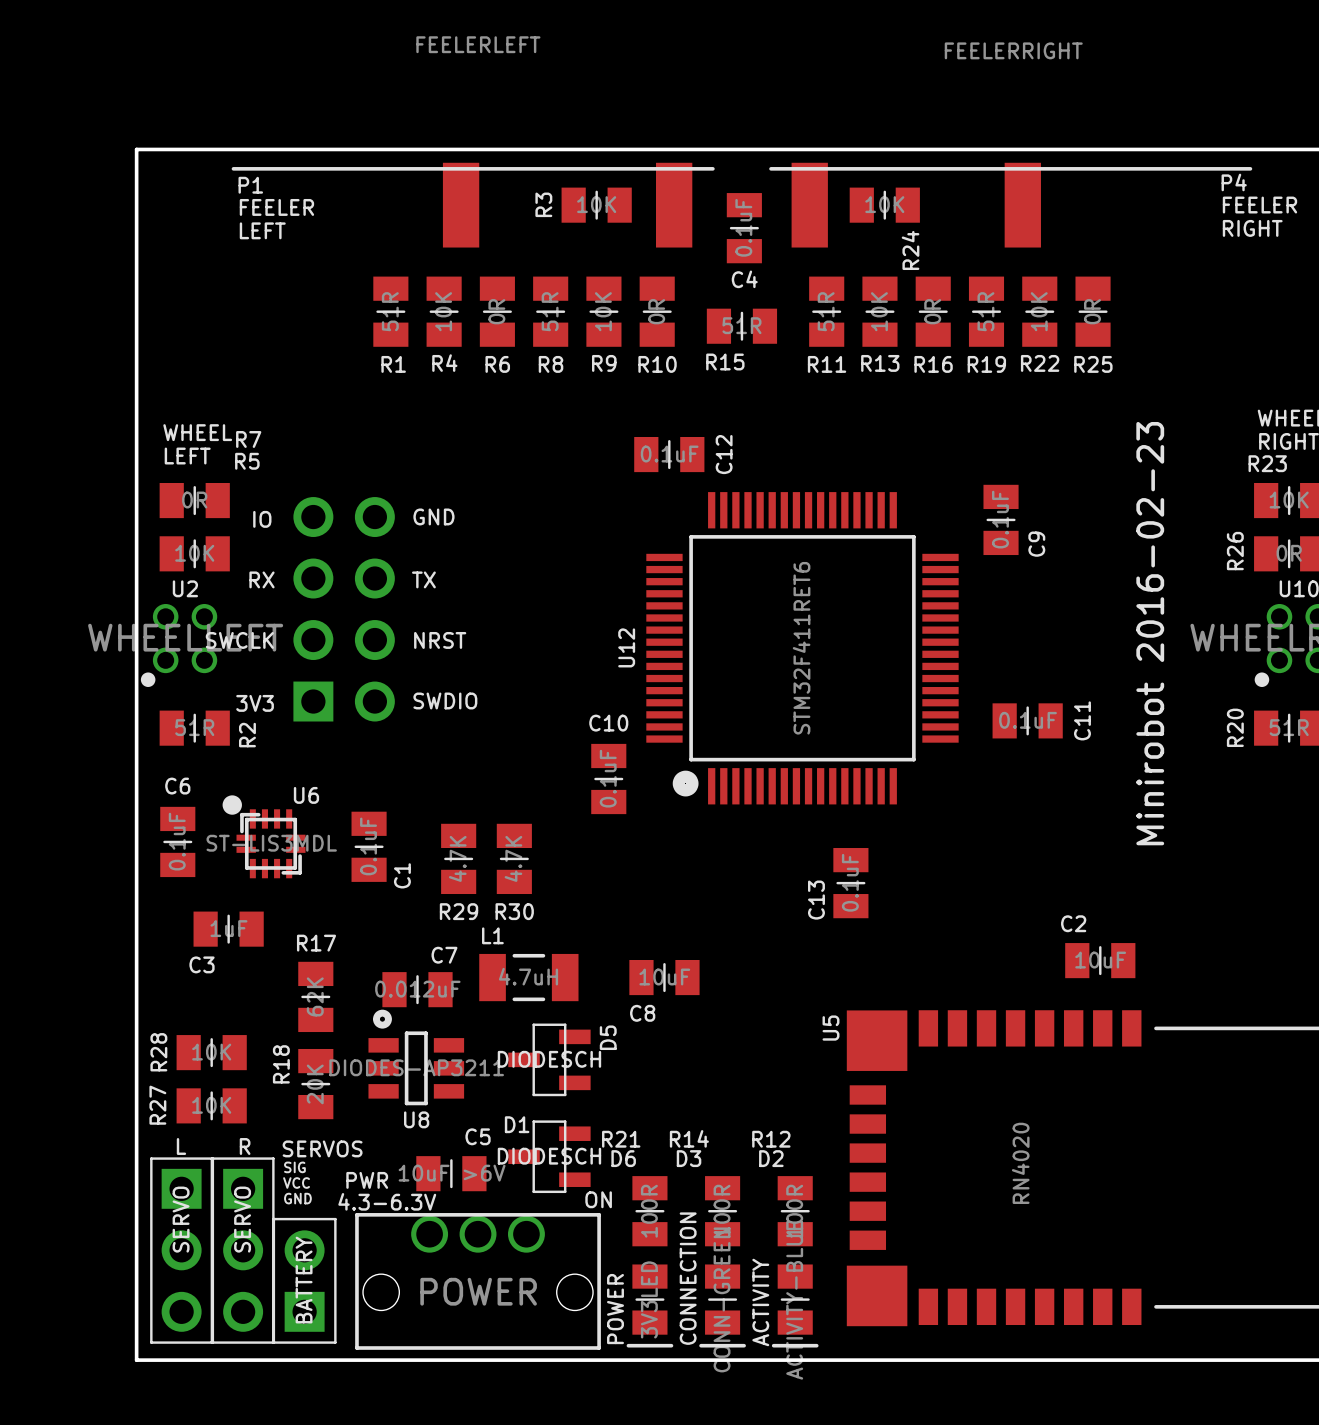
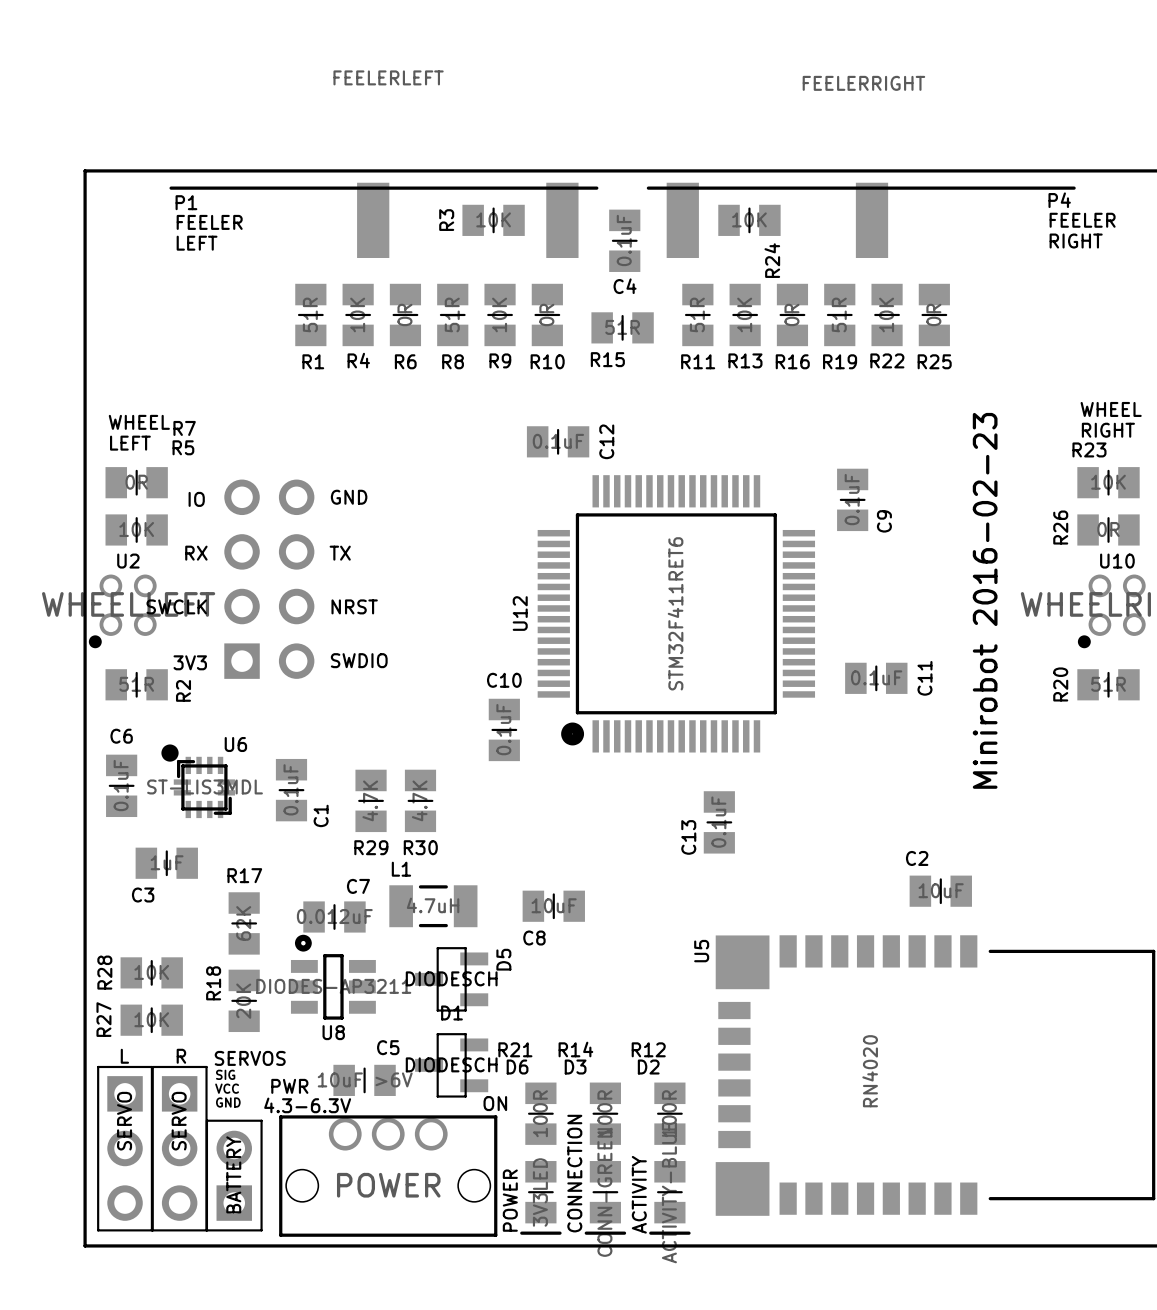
D1 name position: D1 (517, 1124) -> D1 (451, 1012)

